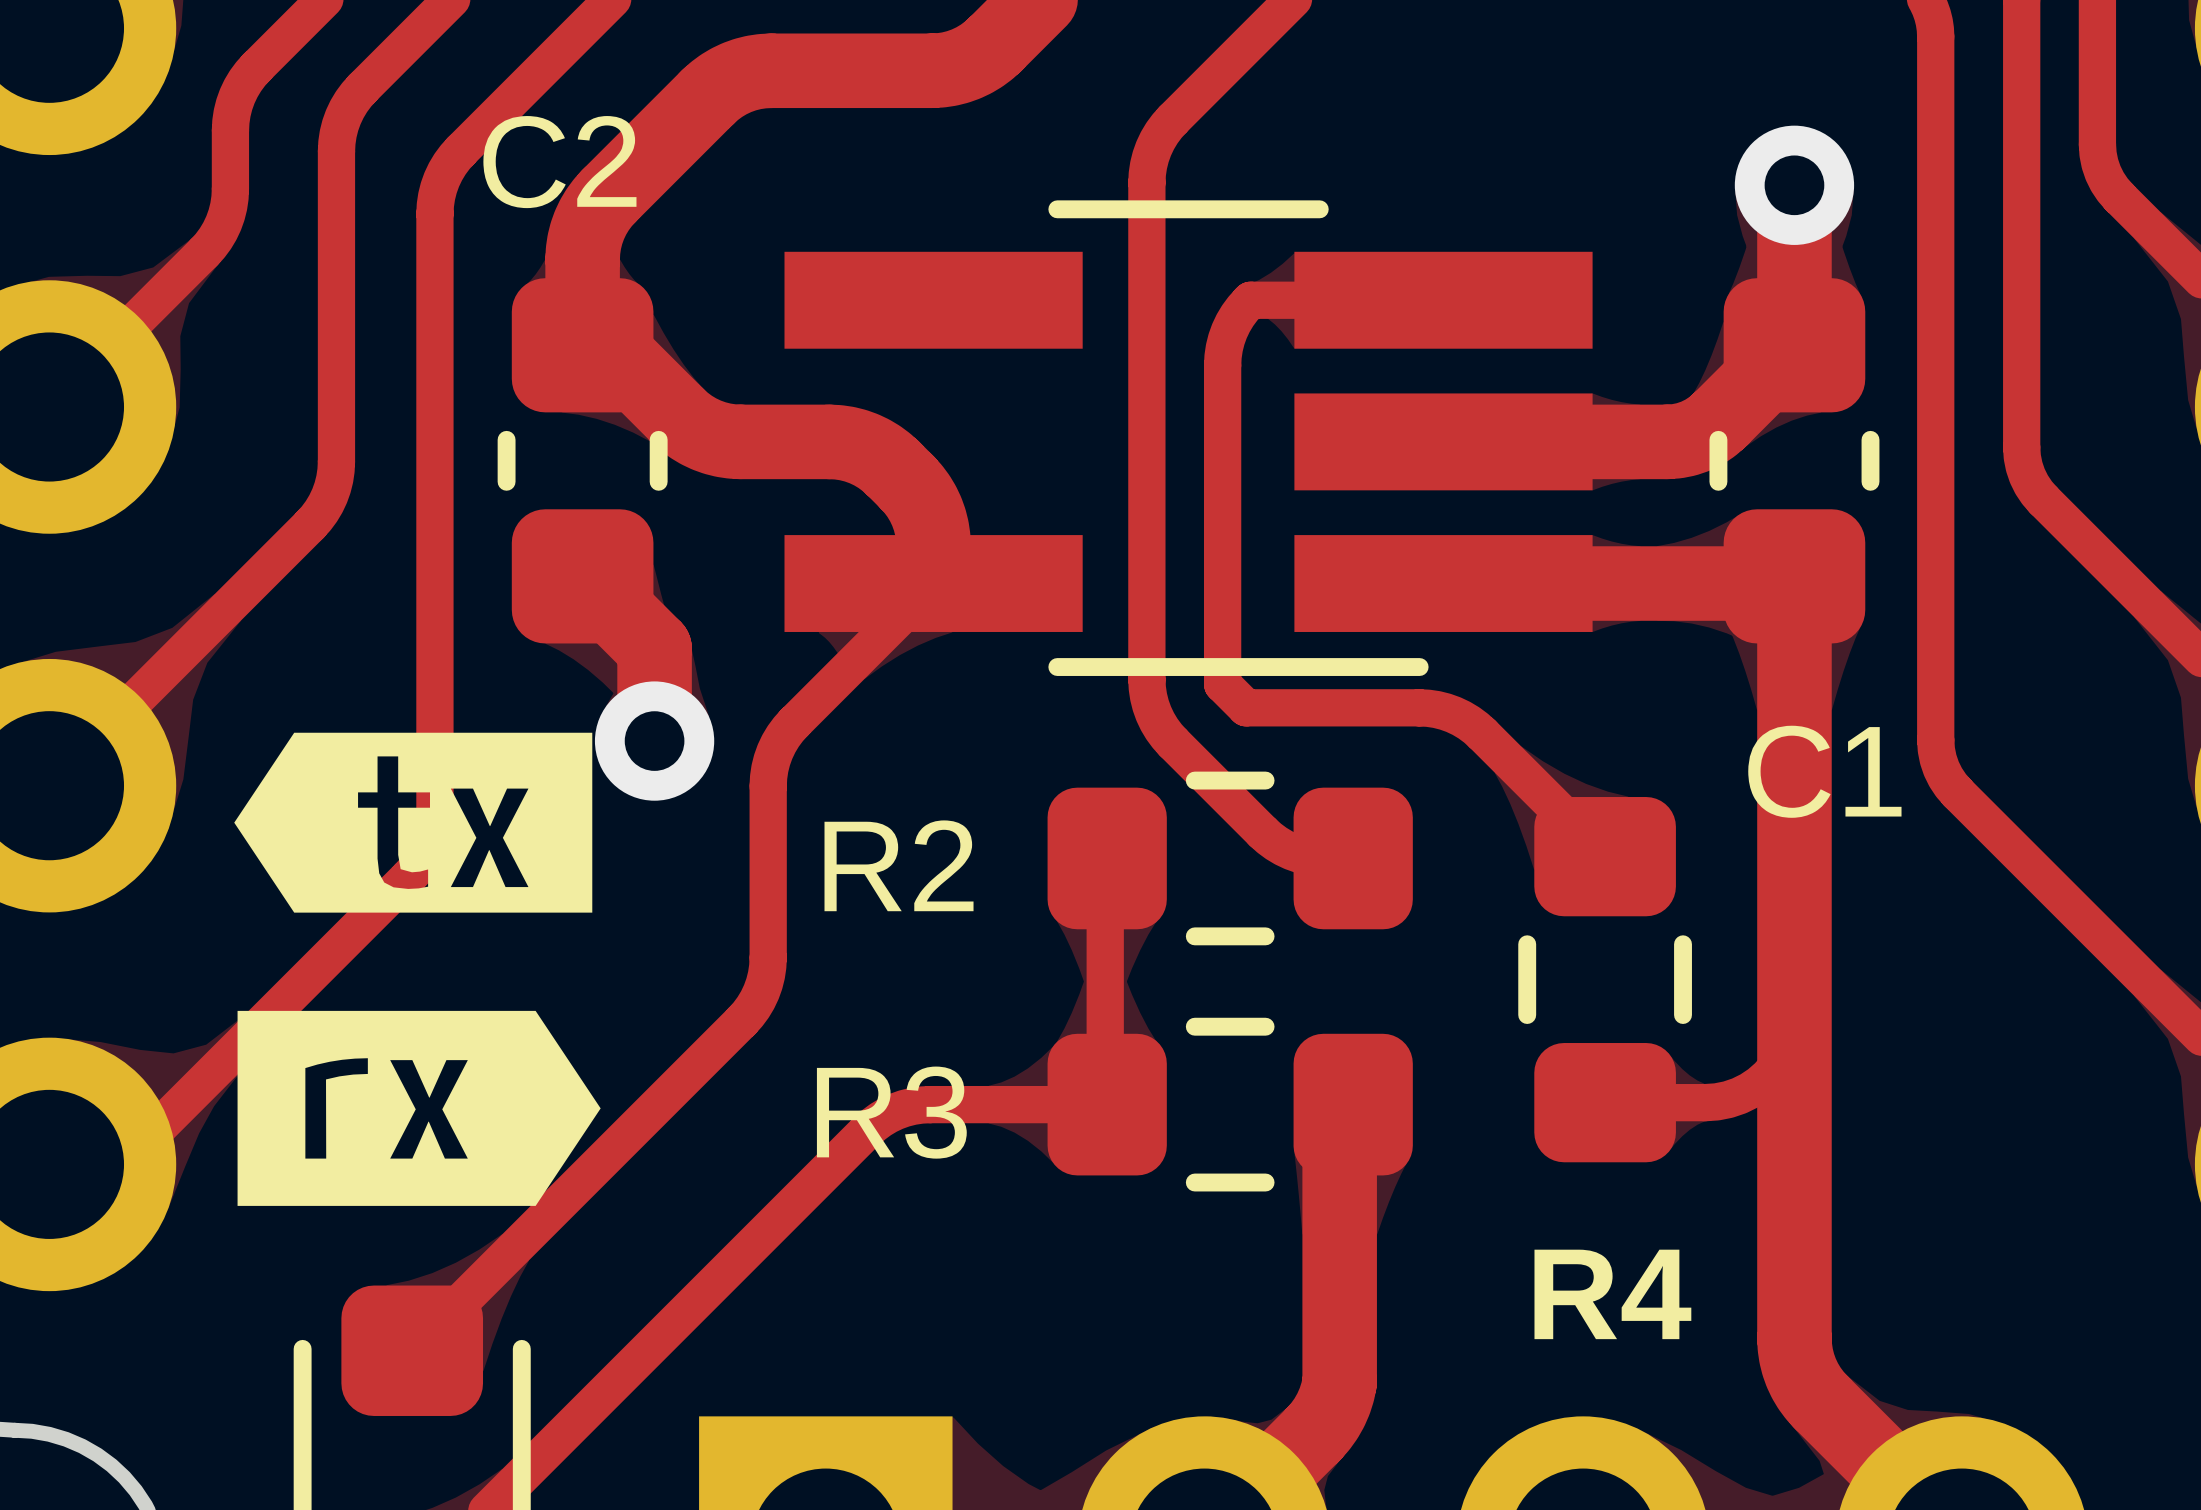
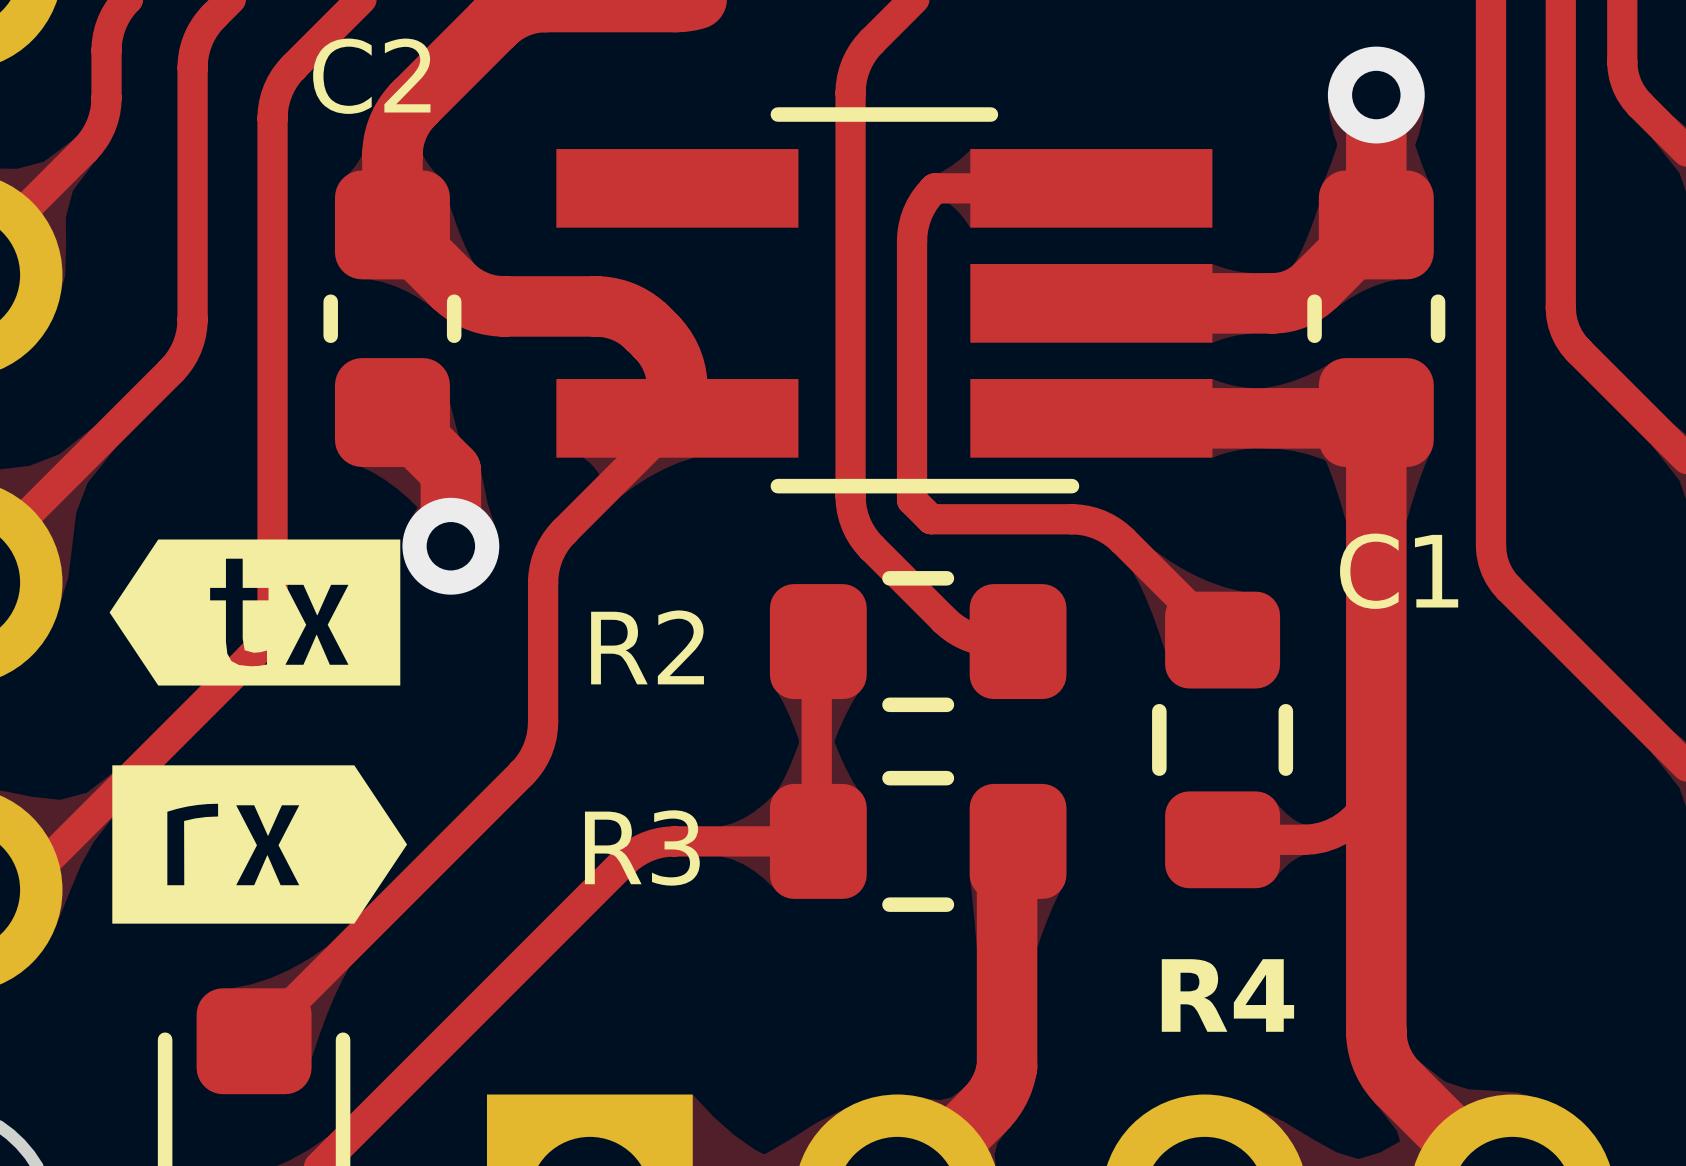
track: (582, 345) (607, 345) (684, 421) (706, 435) (732, 441) (847, 443) (871, 452) (896, 471) -> (392, 224) (452, 285) (476, 300) (496, 306) (610, 307) (630, 315) (647, 327)

